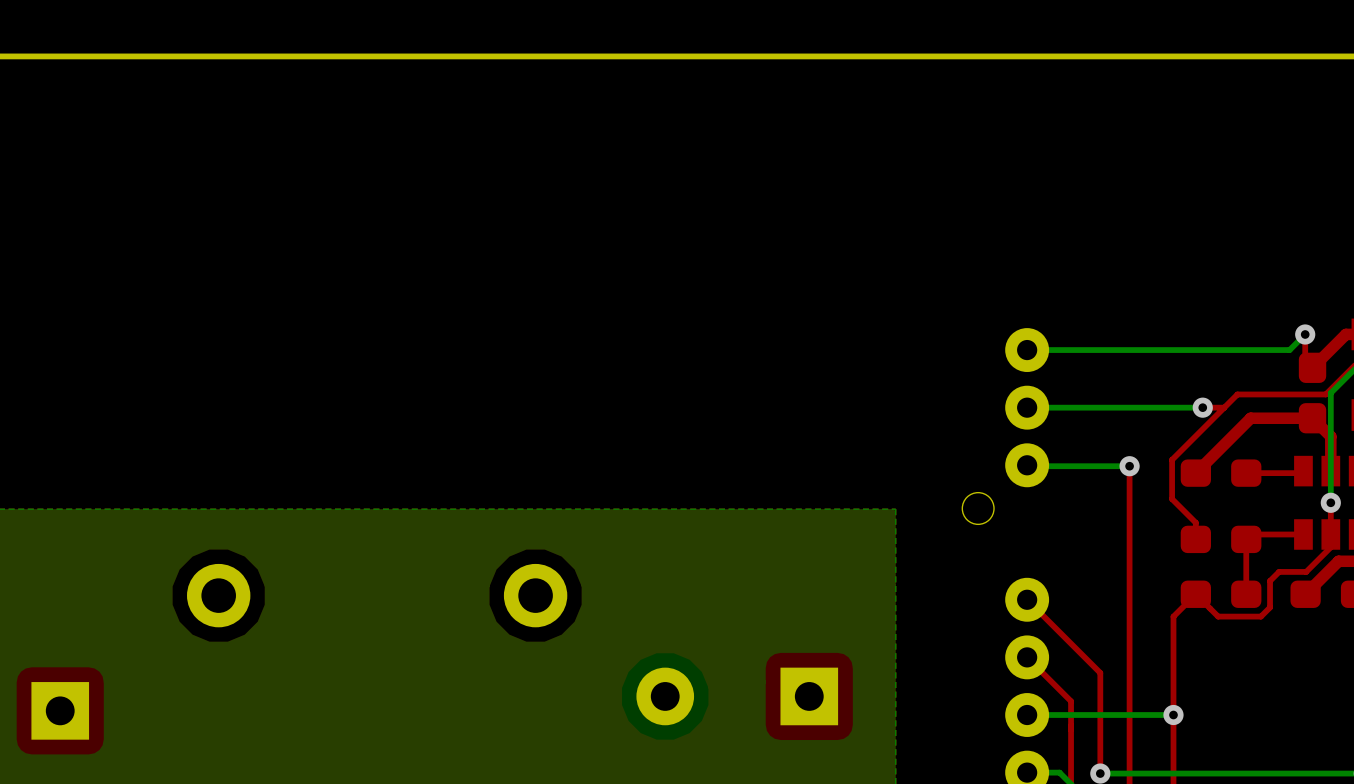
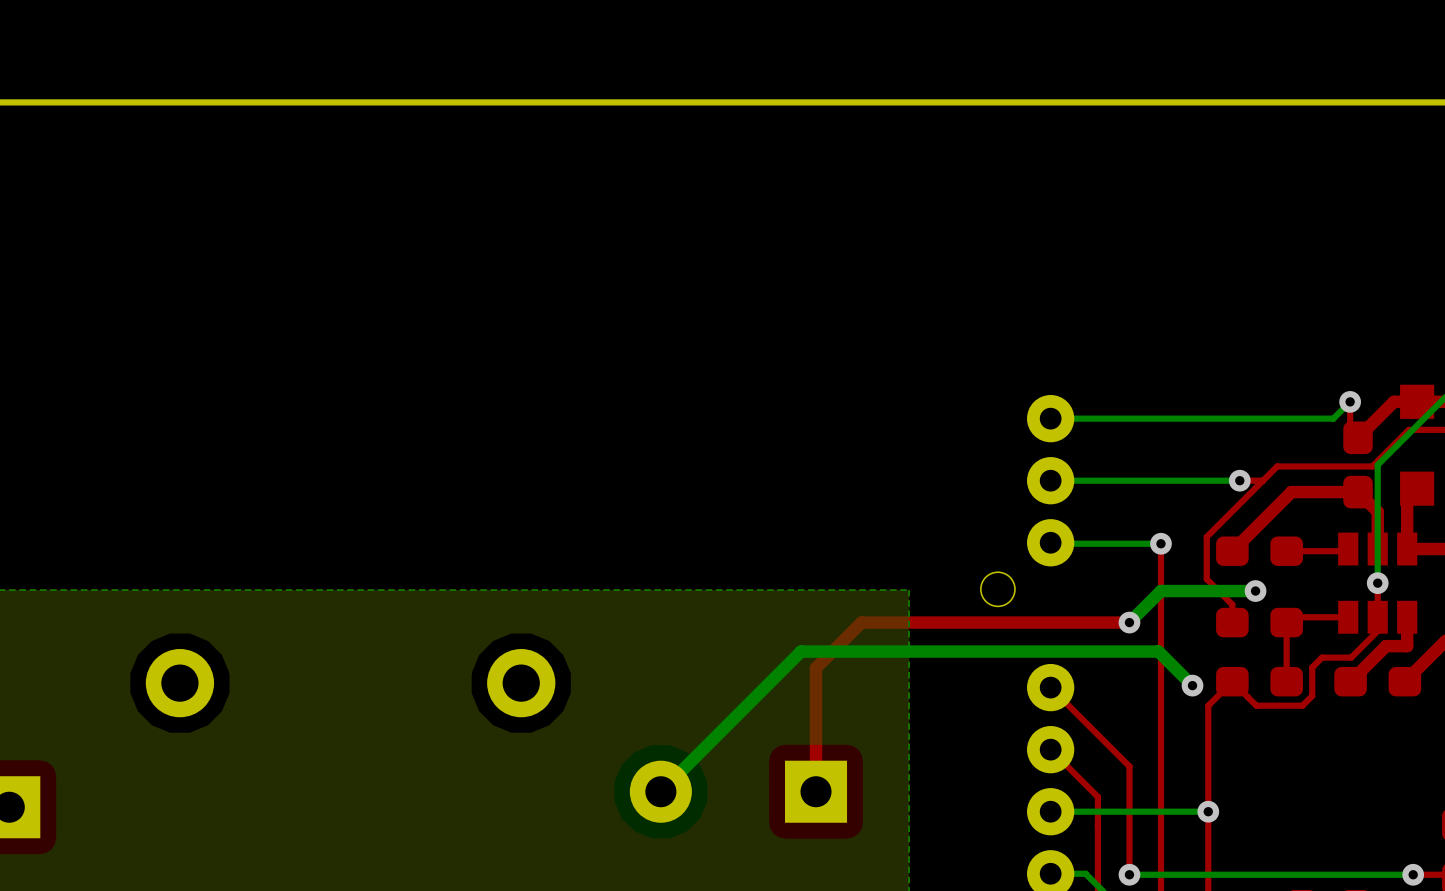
bottom track: none -> (1255, 591) (1160, 591) (1129, 622)
via: none -> (1255, 591)
top track: none -> (1129, 622) (861, 622) (816, 668) (816, 791)
via: none -> (1129, 622)
bottom track: none -> (1192, 685) (1158, 651) (801, 651) (660, 791)
via: none -> (1192, 685)

